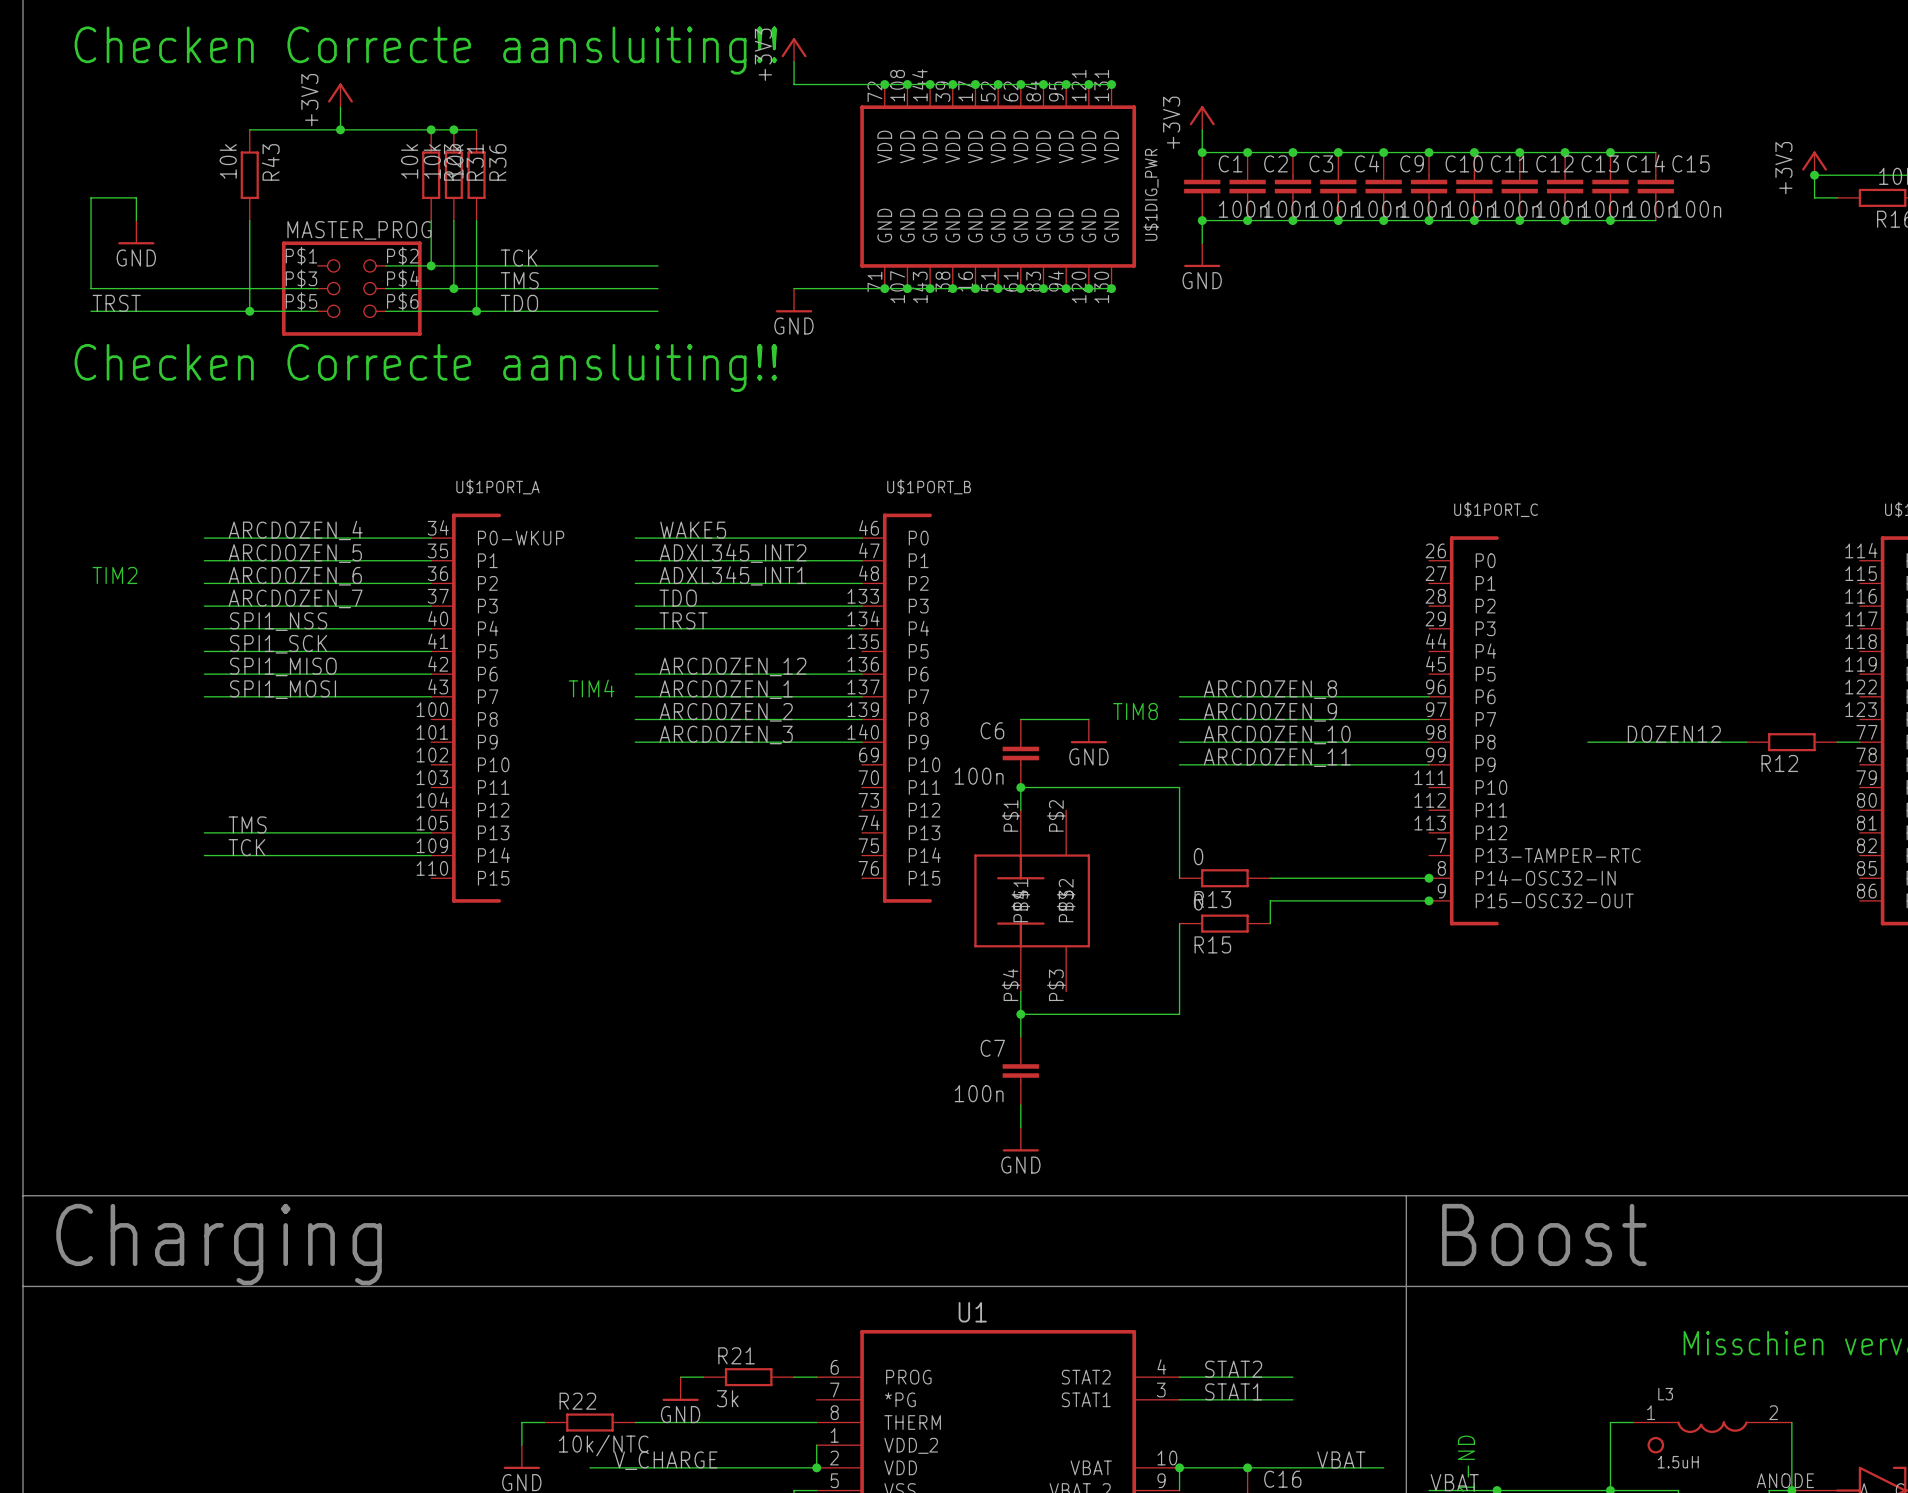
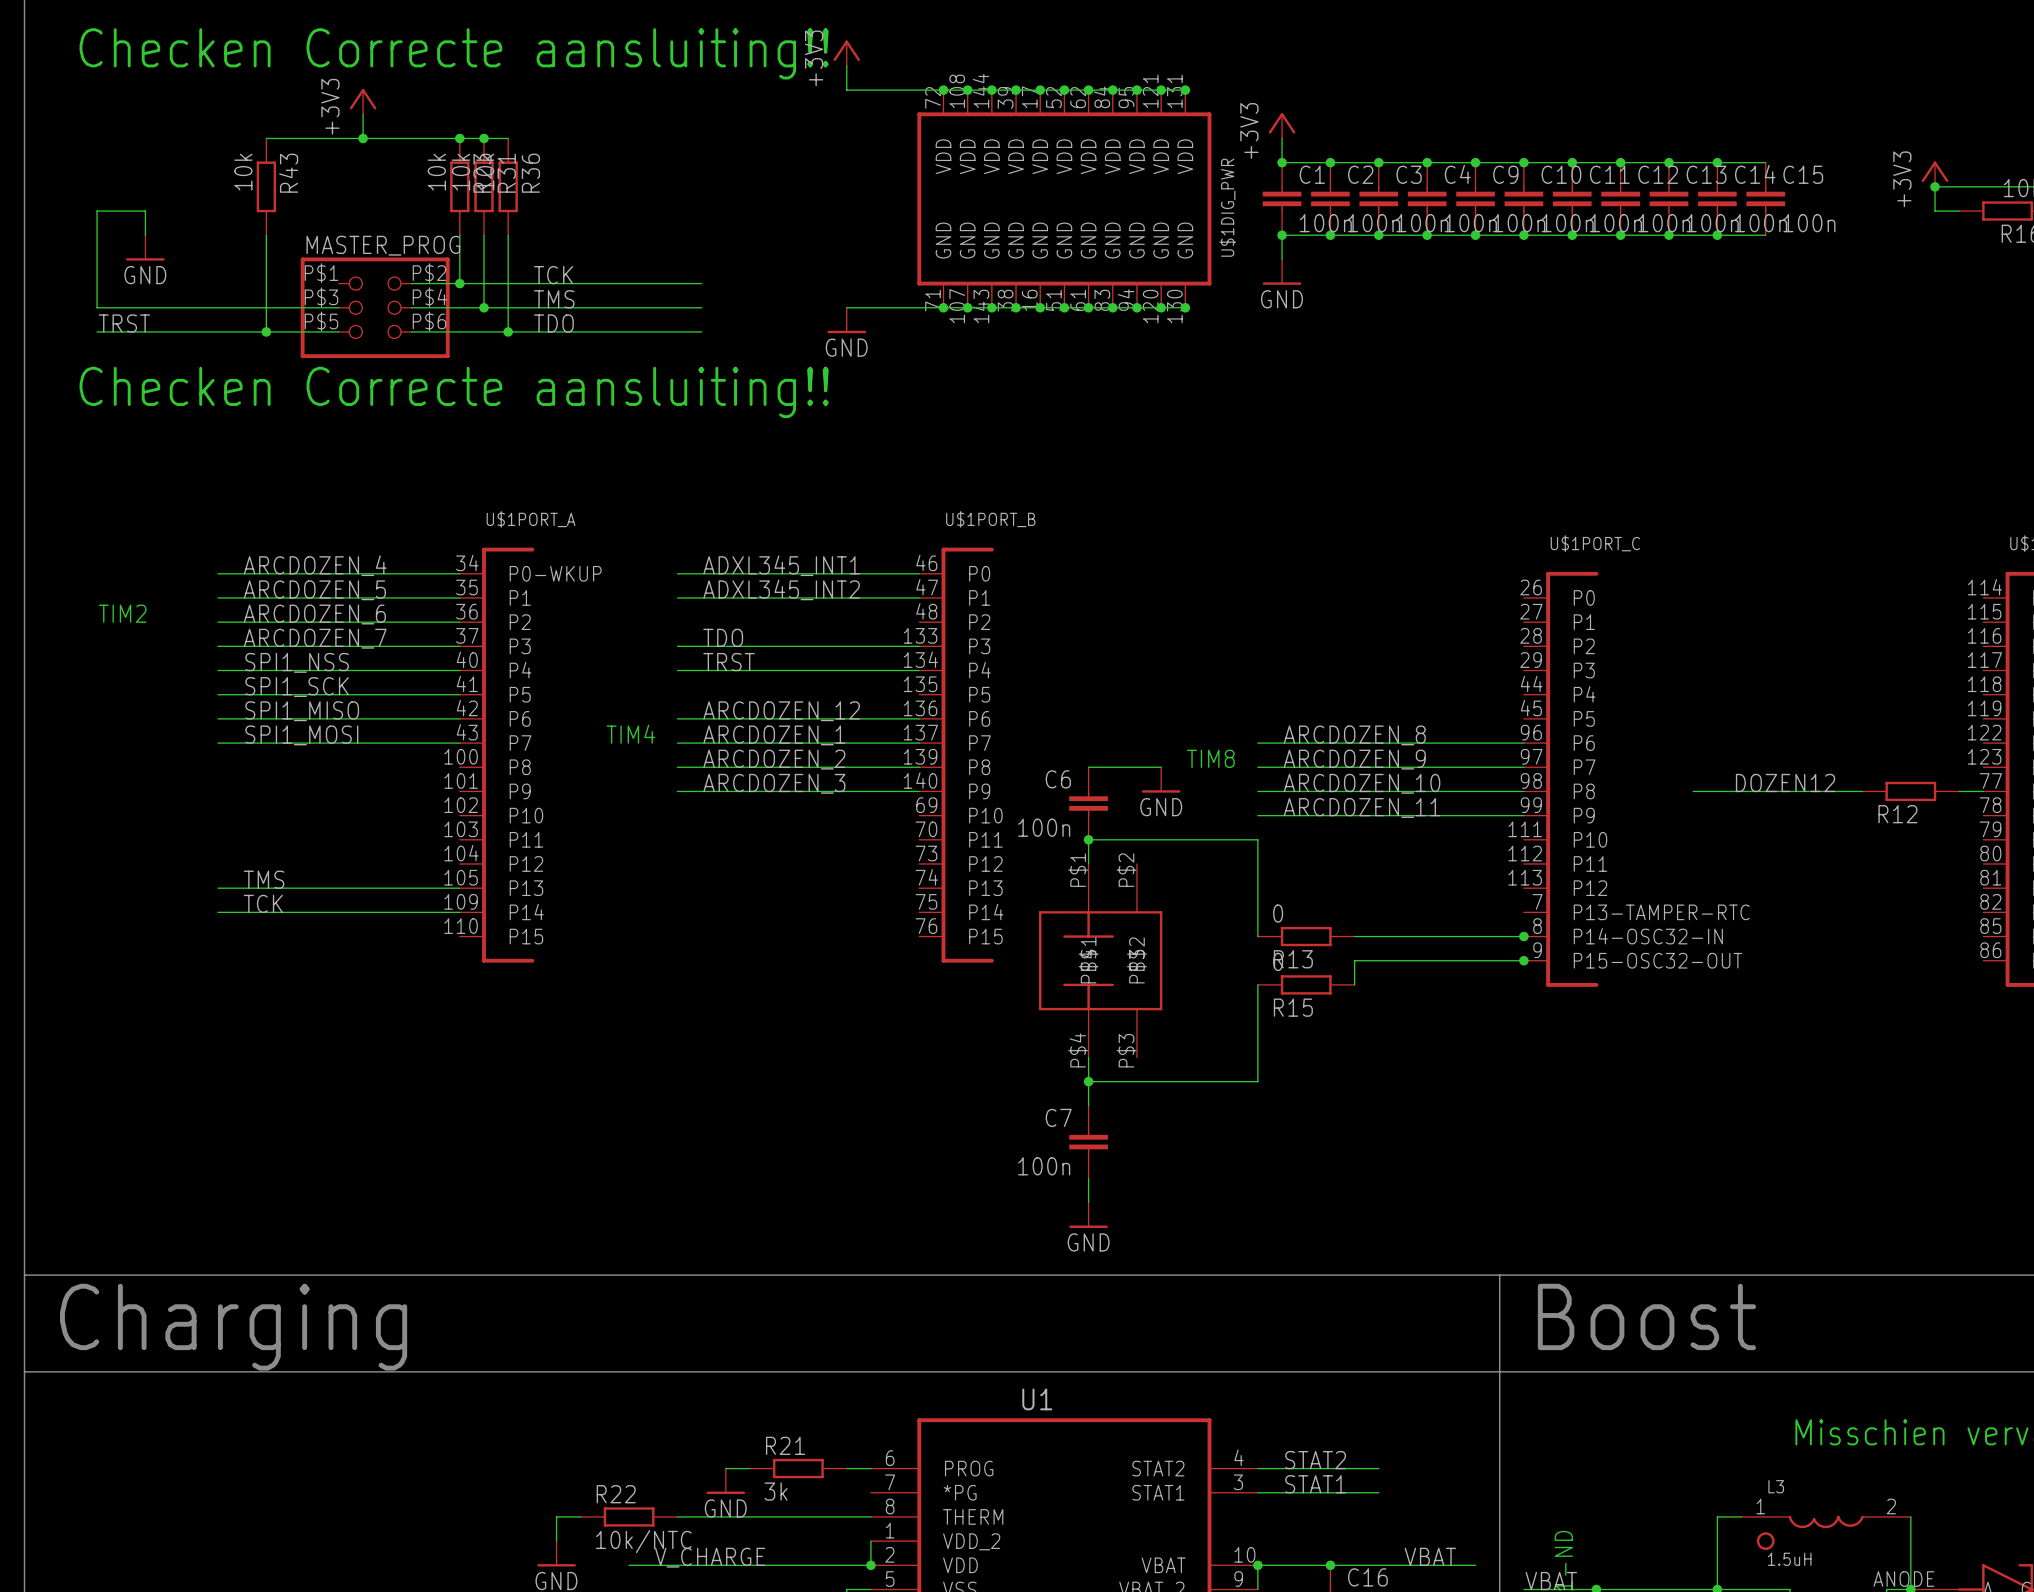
label: WAKE5 (693, 530) -> ADXL345_INT1 (781, 565)
label: ADXL345_INT1 (732, 575) -> none
wire: (635, 583) (862, 583) -> none

